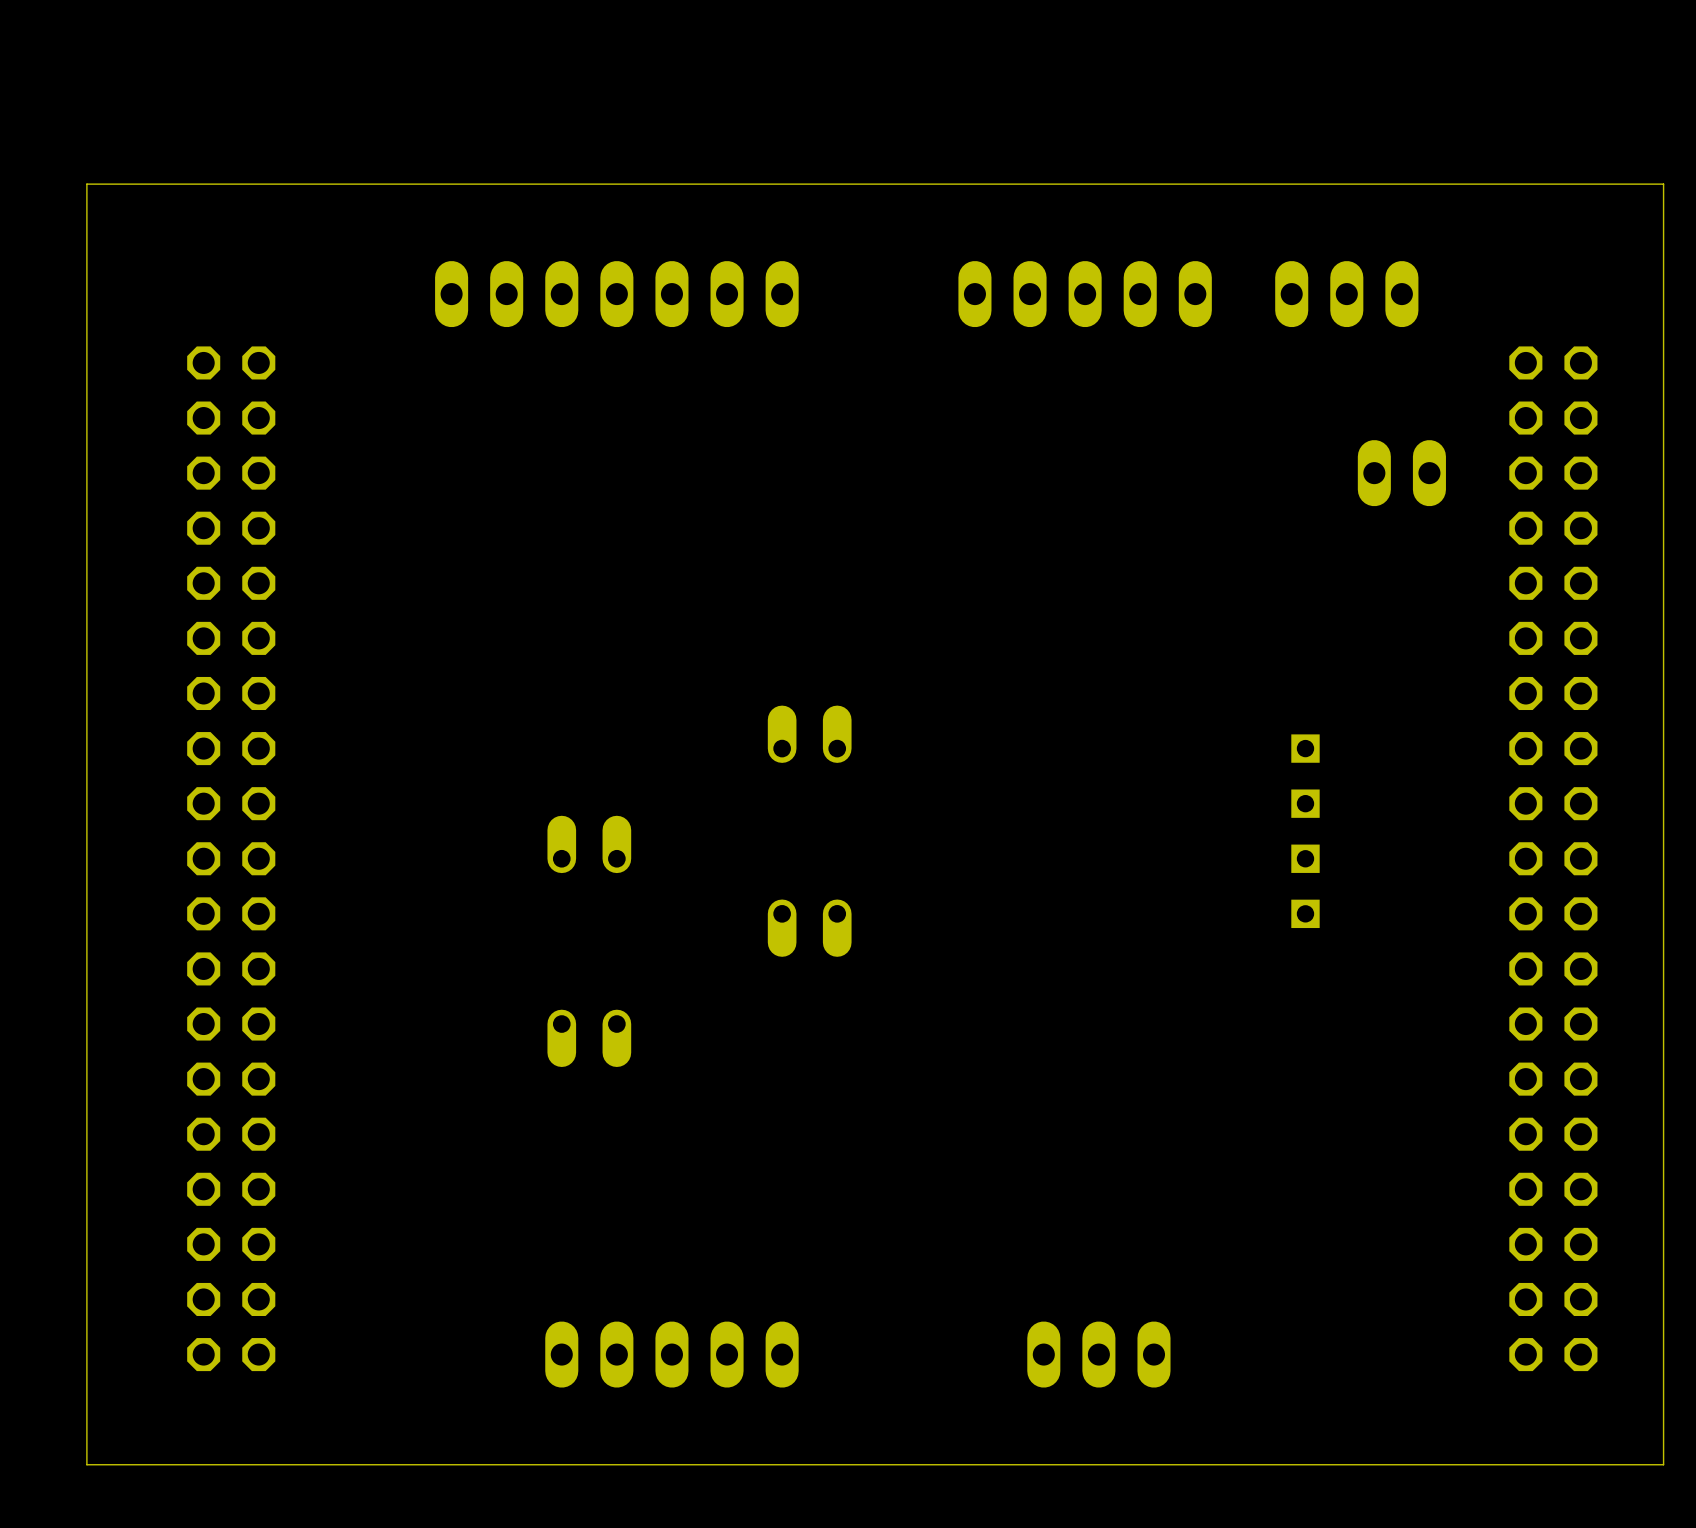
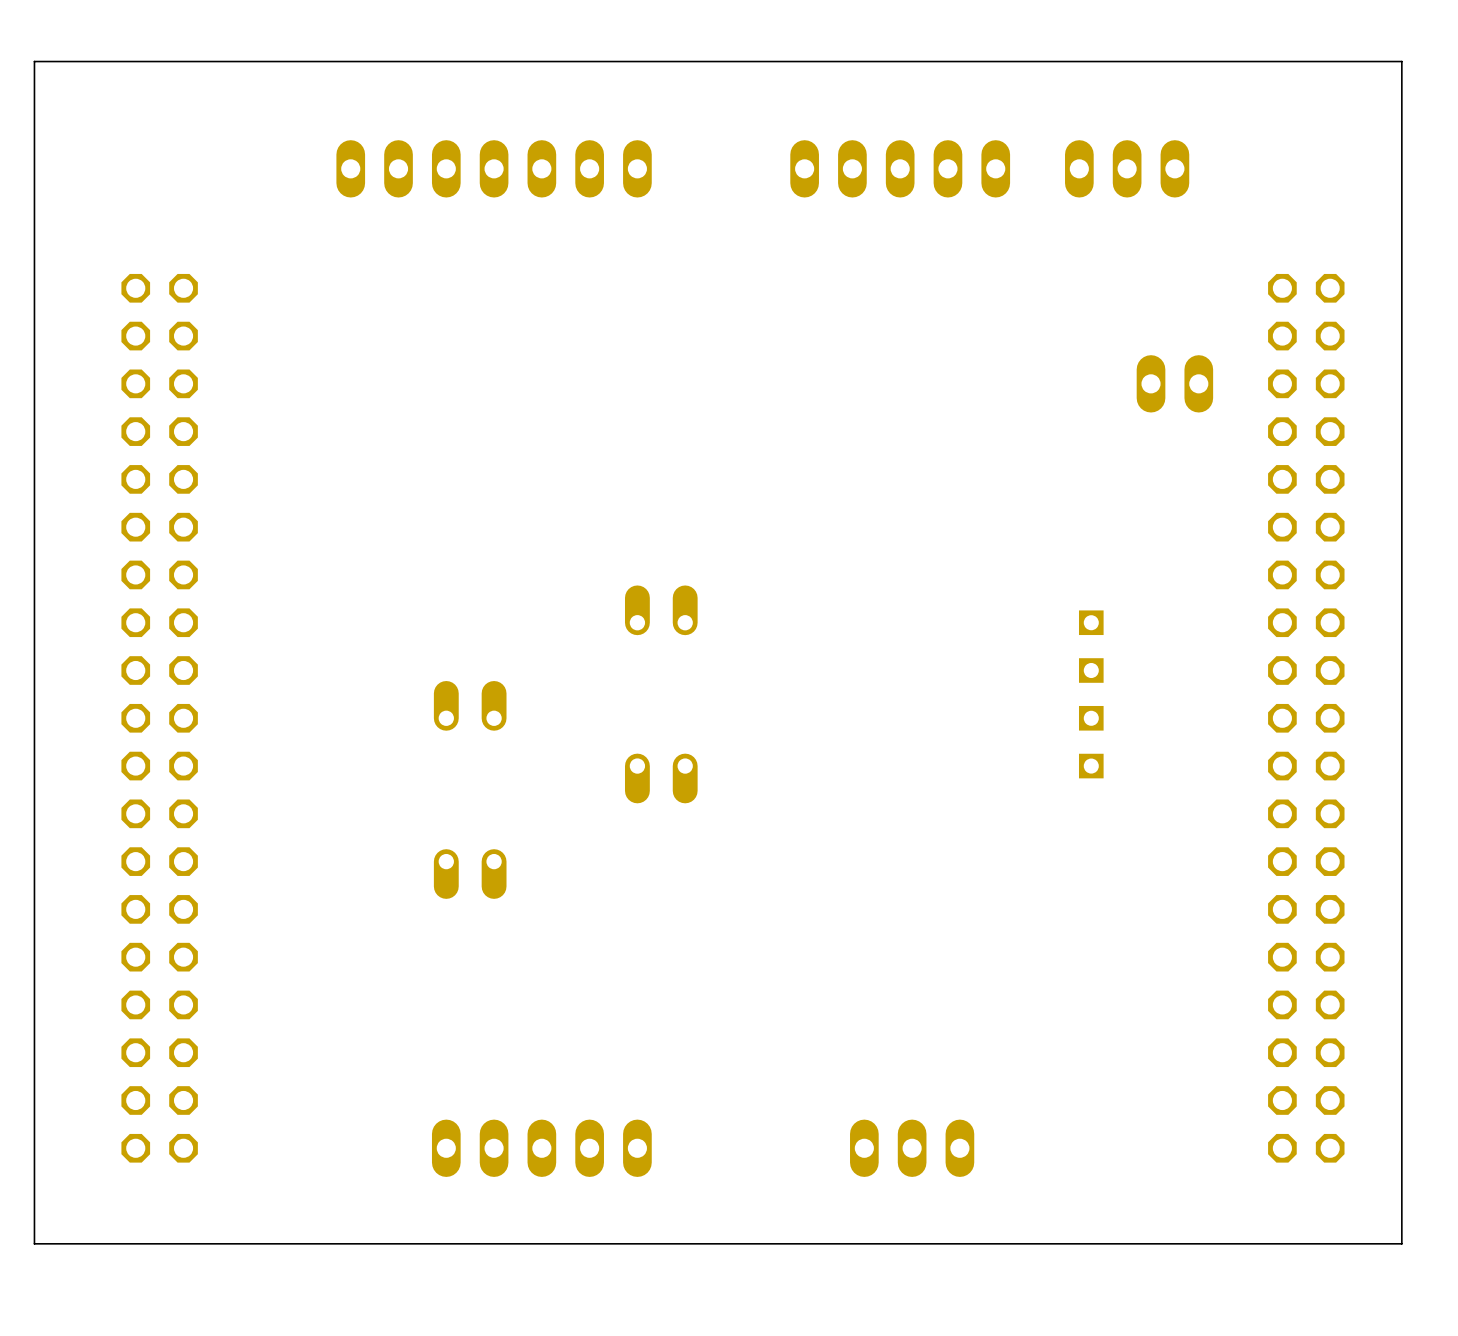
board edge: (1663, 184) (86, 184) -> (1401, 133) (1401, 61) (34, 61) (34, 133)
part position: (616, 294) -> (494, 168)
part position: (1085, 294) -> (900, 168)
part position: (1346, 294) -> (1127, 168)

